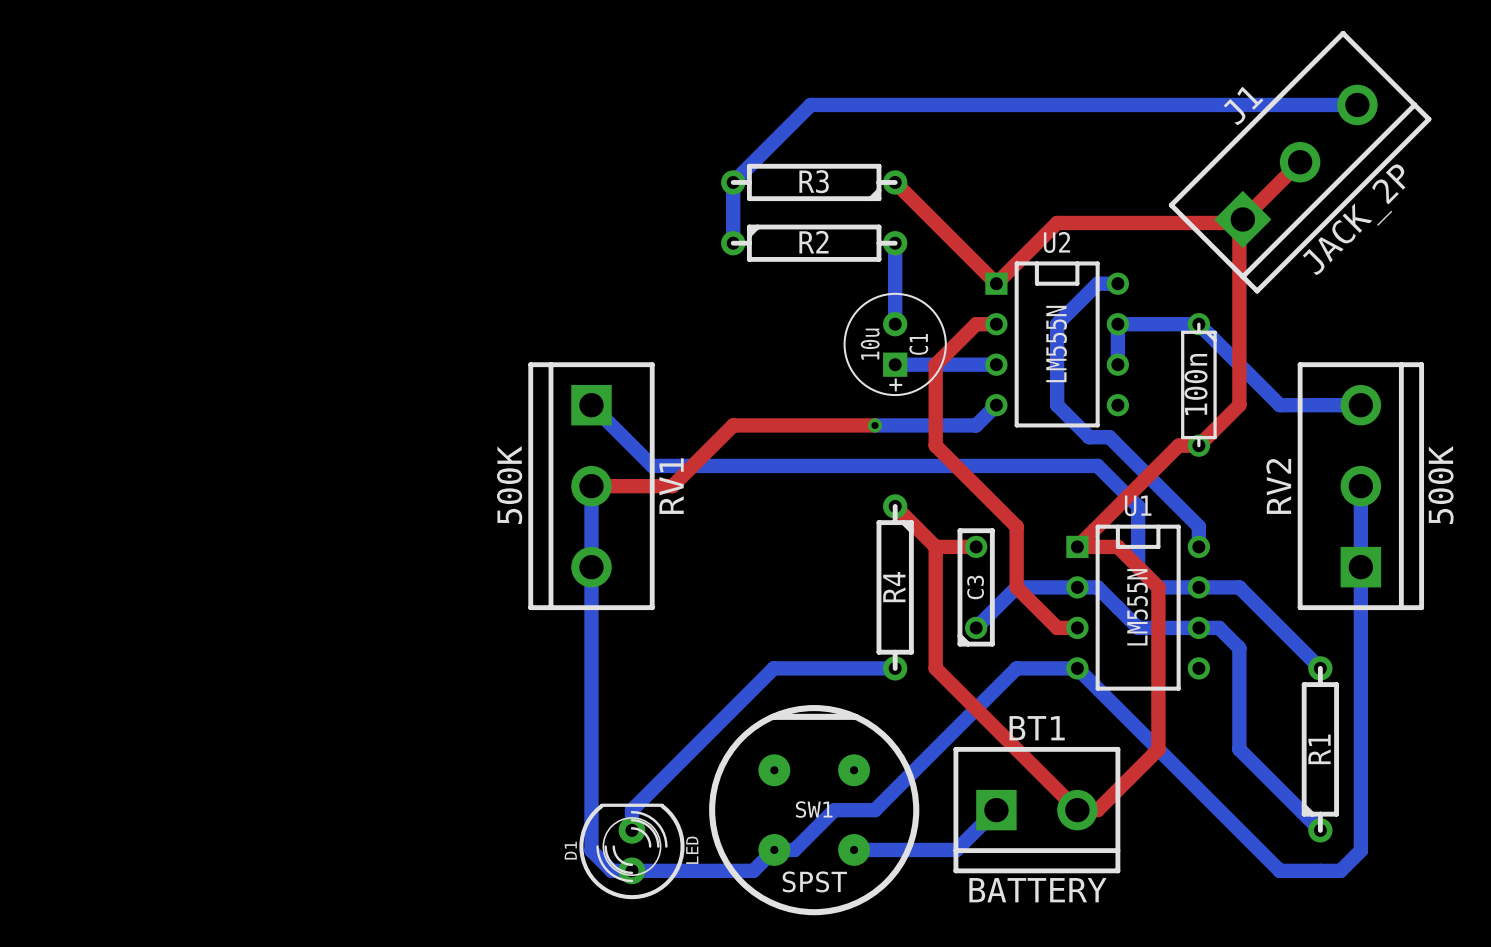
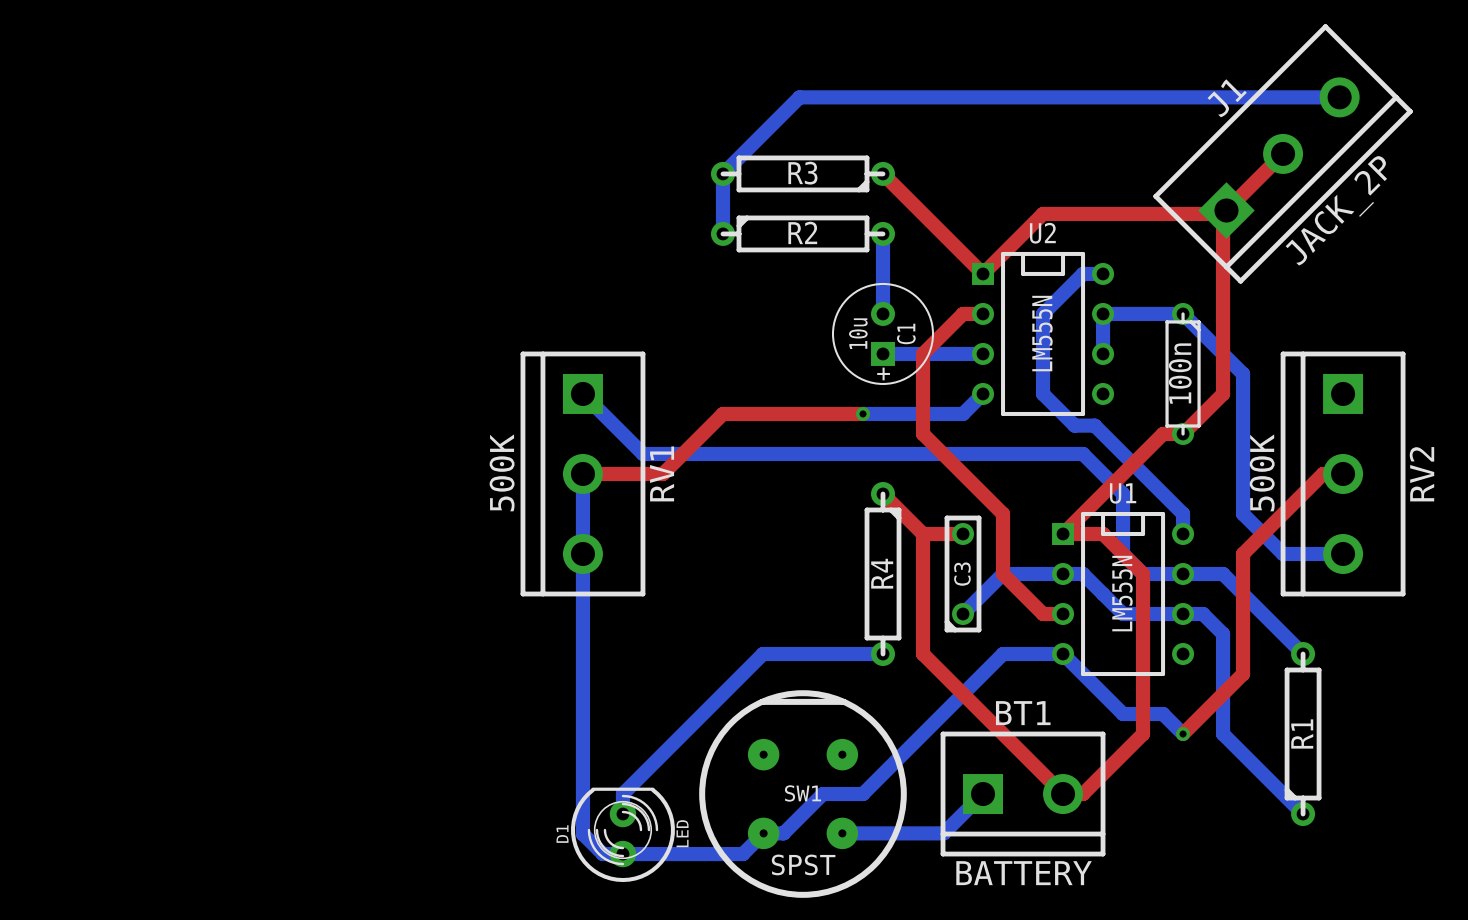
bottom track: (1259, 384) (1279, 405) (1360, 405) -> (1243, 373) (1243, 513) (1283, 553) (1343, 553)
top track: none -> (1343, 473) (1323, 473) (1243, 553) (1243, 674) (1183, 734)
bottom track: (1360, 486) (1360, 850) (1340, 870) (1279, 870) (1138, 729) -> (1183, 734) (1163, 714) (1123, 714)
RV2 rotation: 0° (1360, 486) -> 180° (1343, 473)
via: none -> (1183, 734)

